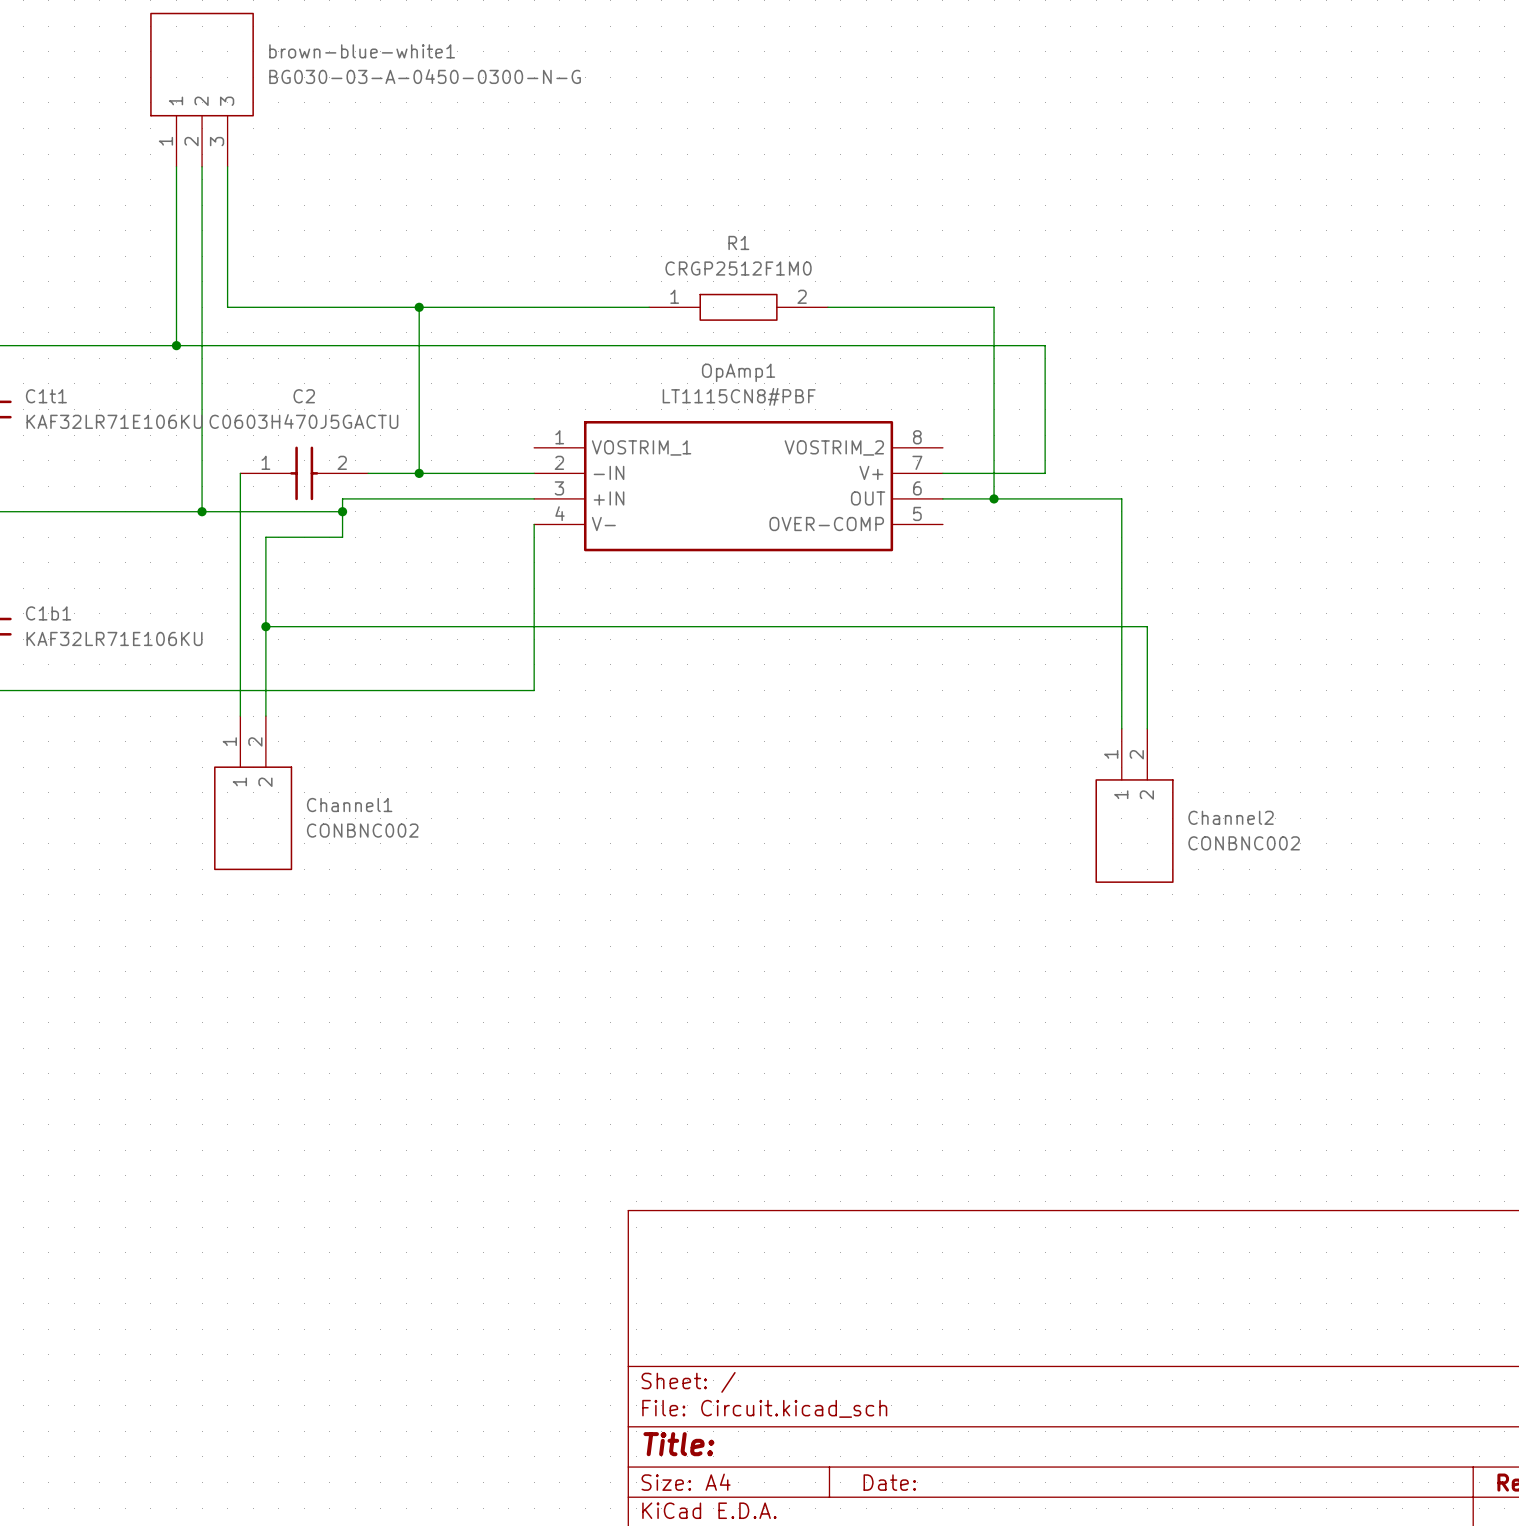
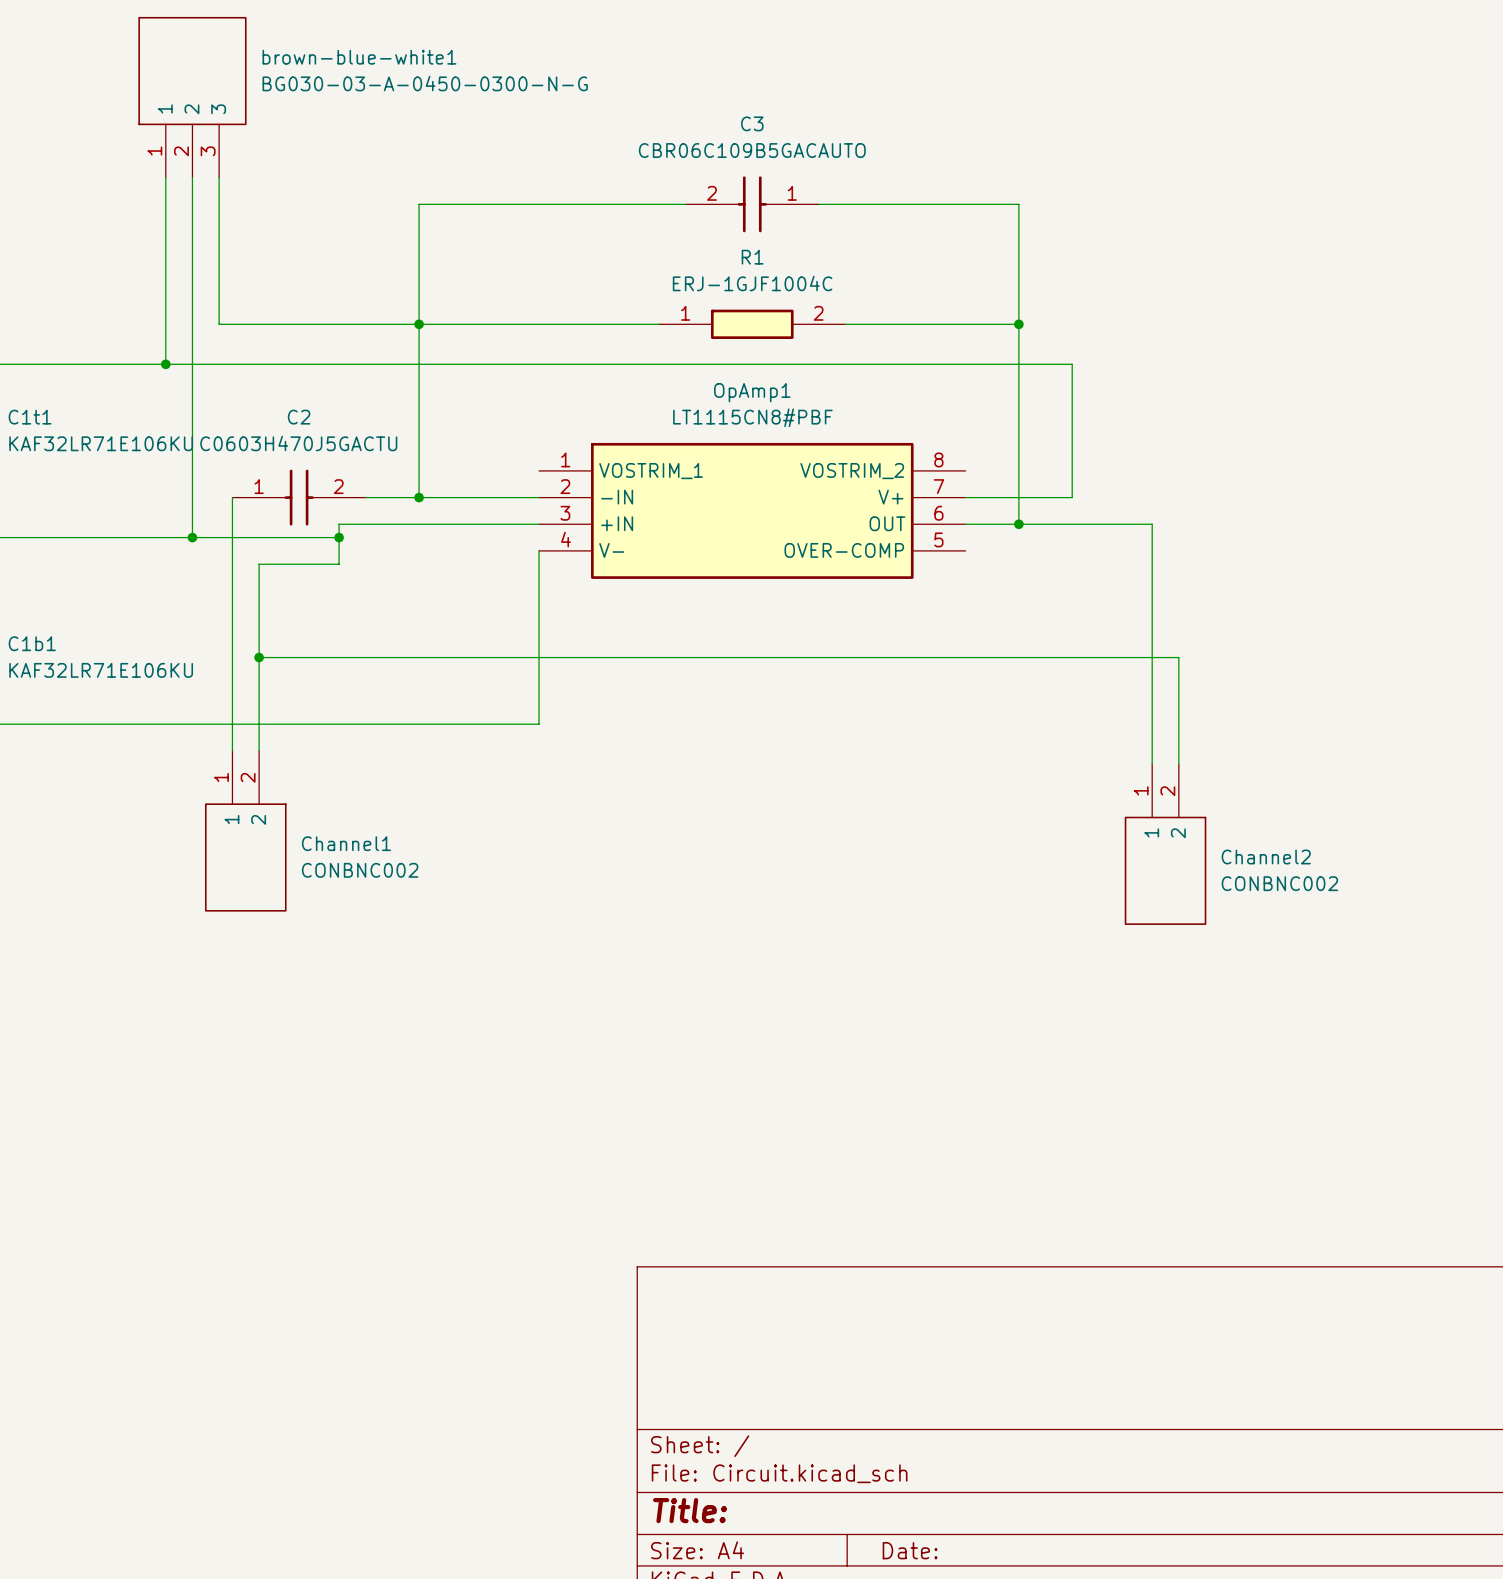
wire: none -> (685, 204) (419, 204) (419, 324)
C3: none -> CBR06C109B5GACAUTO (752, 204)
wire: none -> (818, 204) (1018, 204) (1018, 324)
R1 value: CRGP2512F1M0 (738, 268) -> ERJ-1GJF1004C (752, 283)
R1 symbol: [649, 293, 828, 321] -> [658, 309, 846, 339]
junction: none -> (1018, 324)

